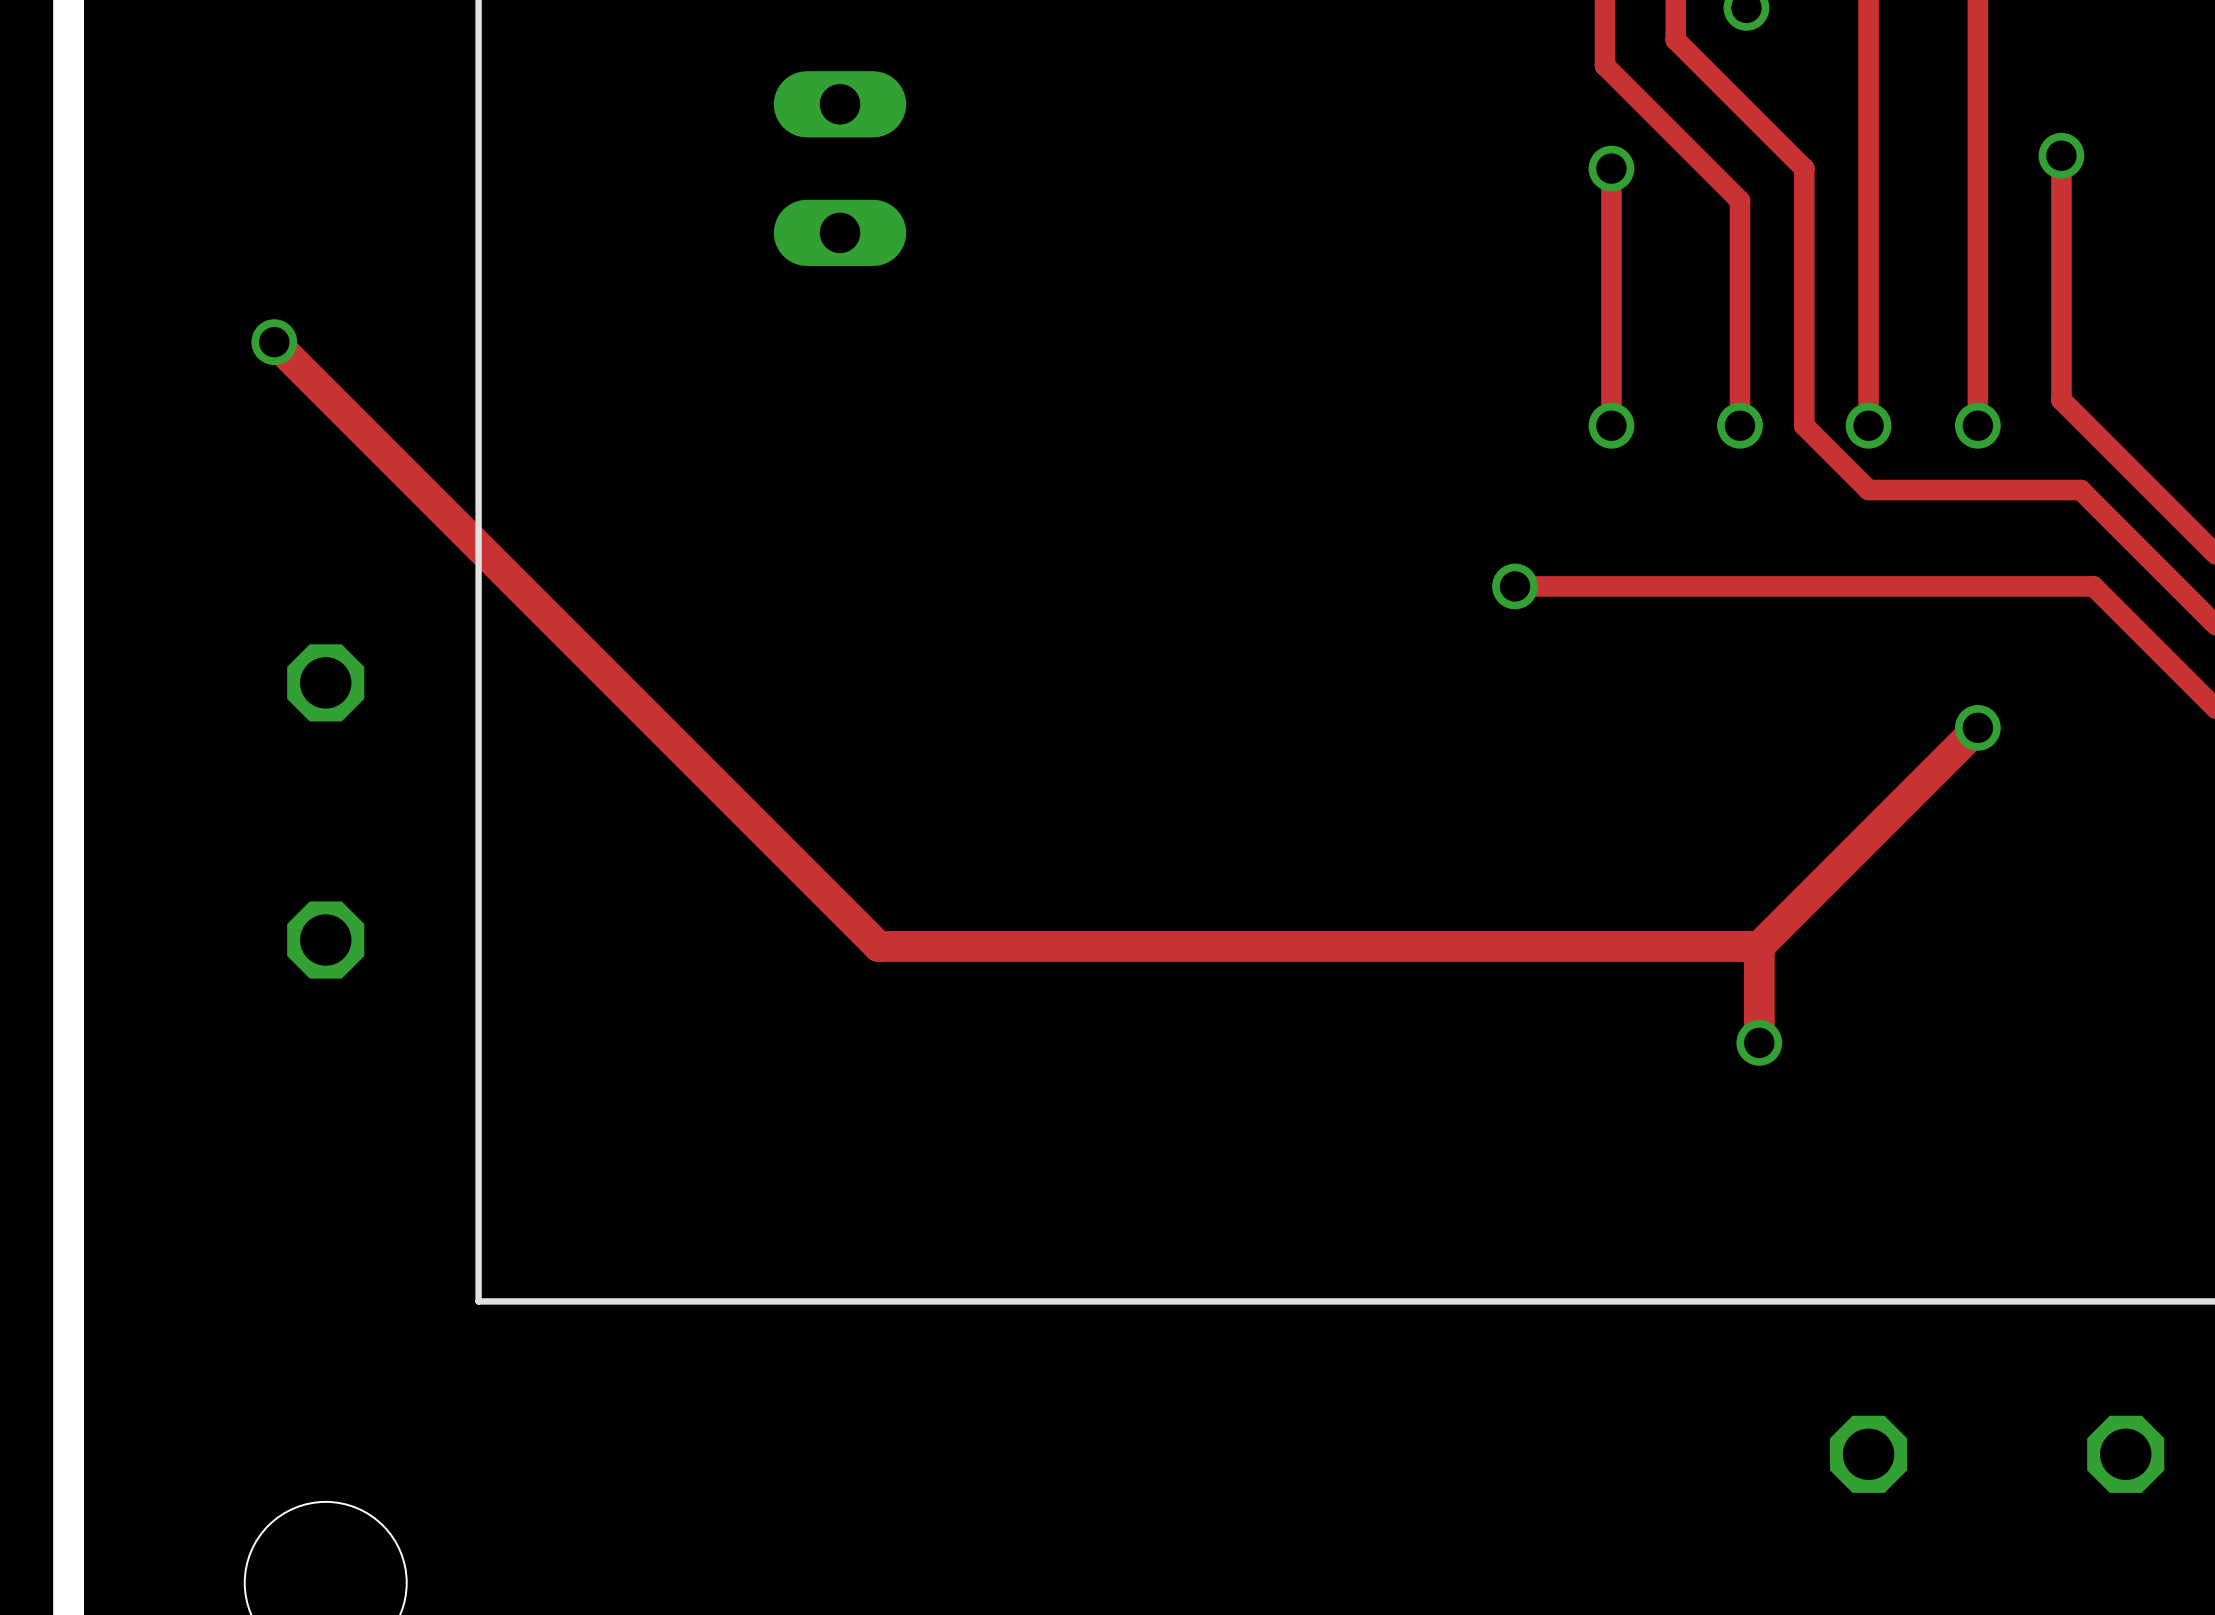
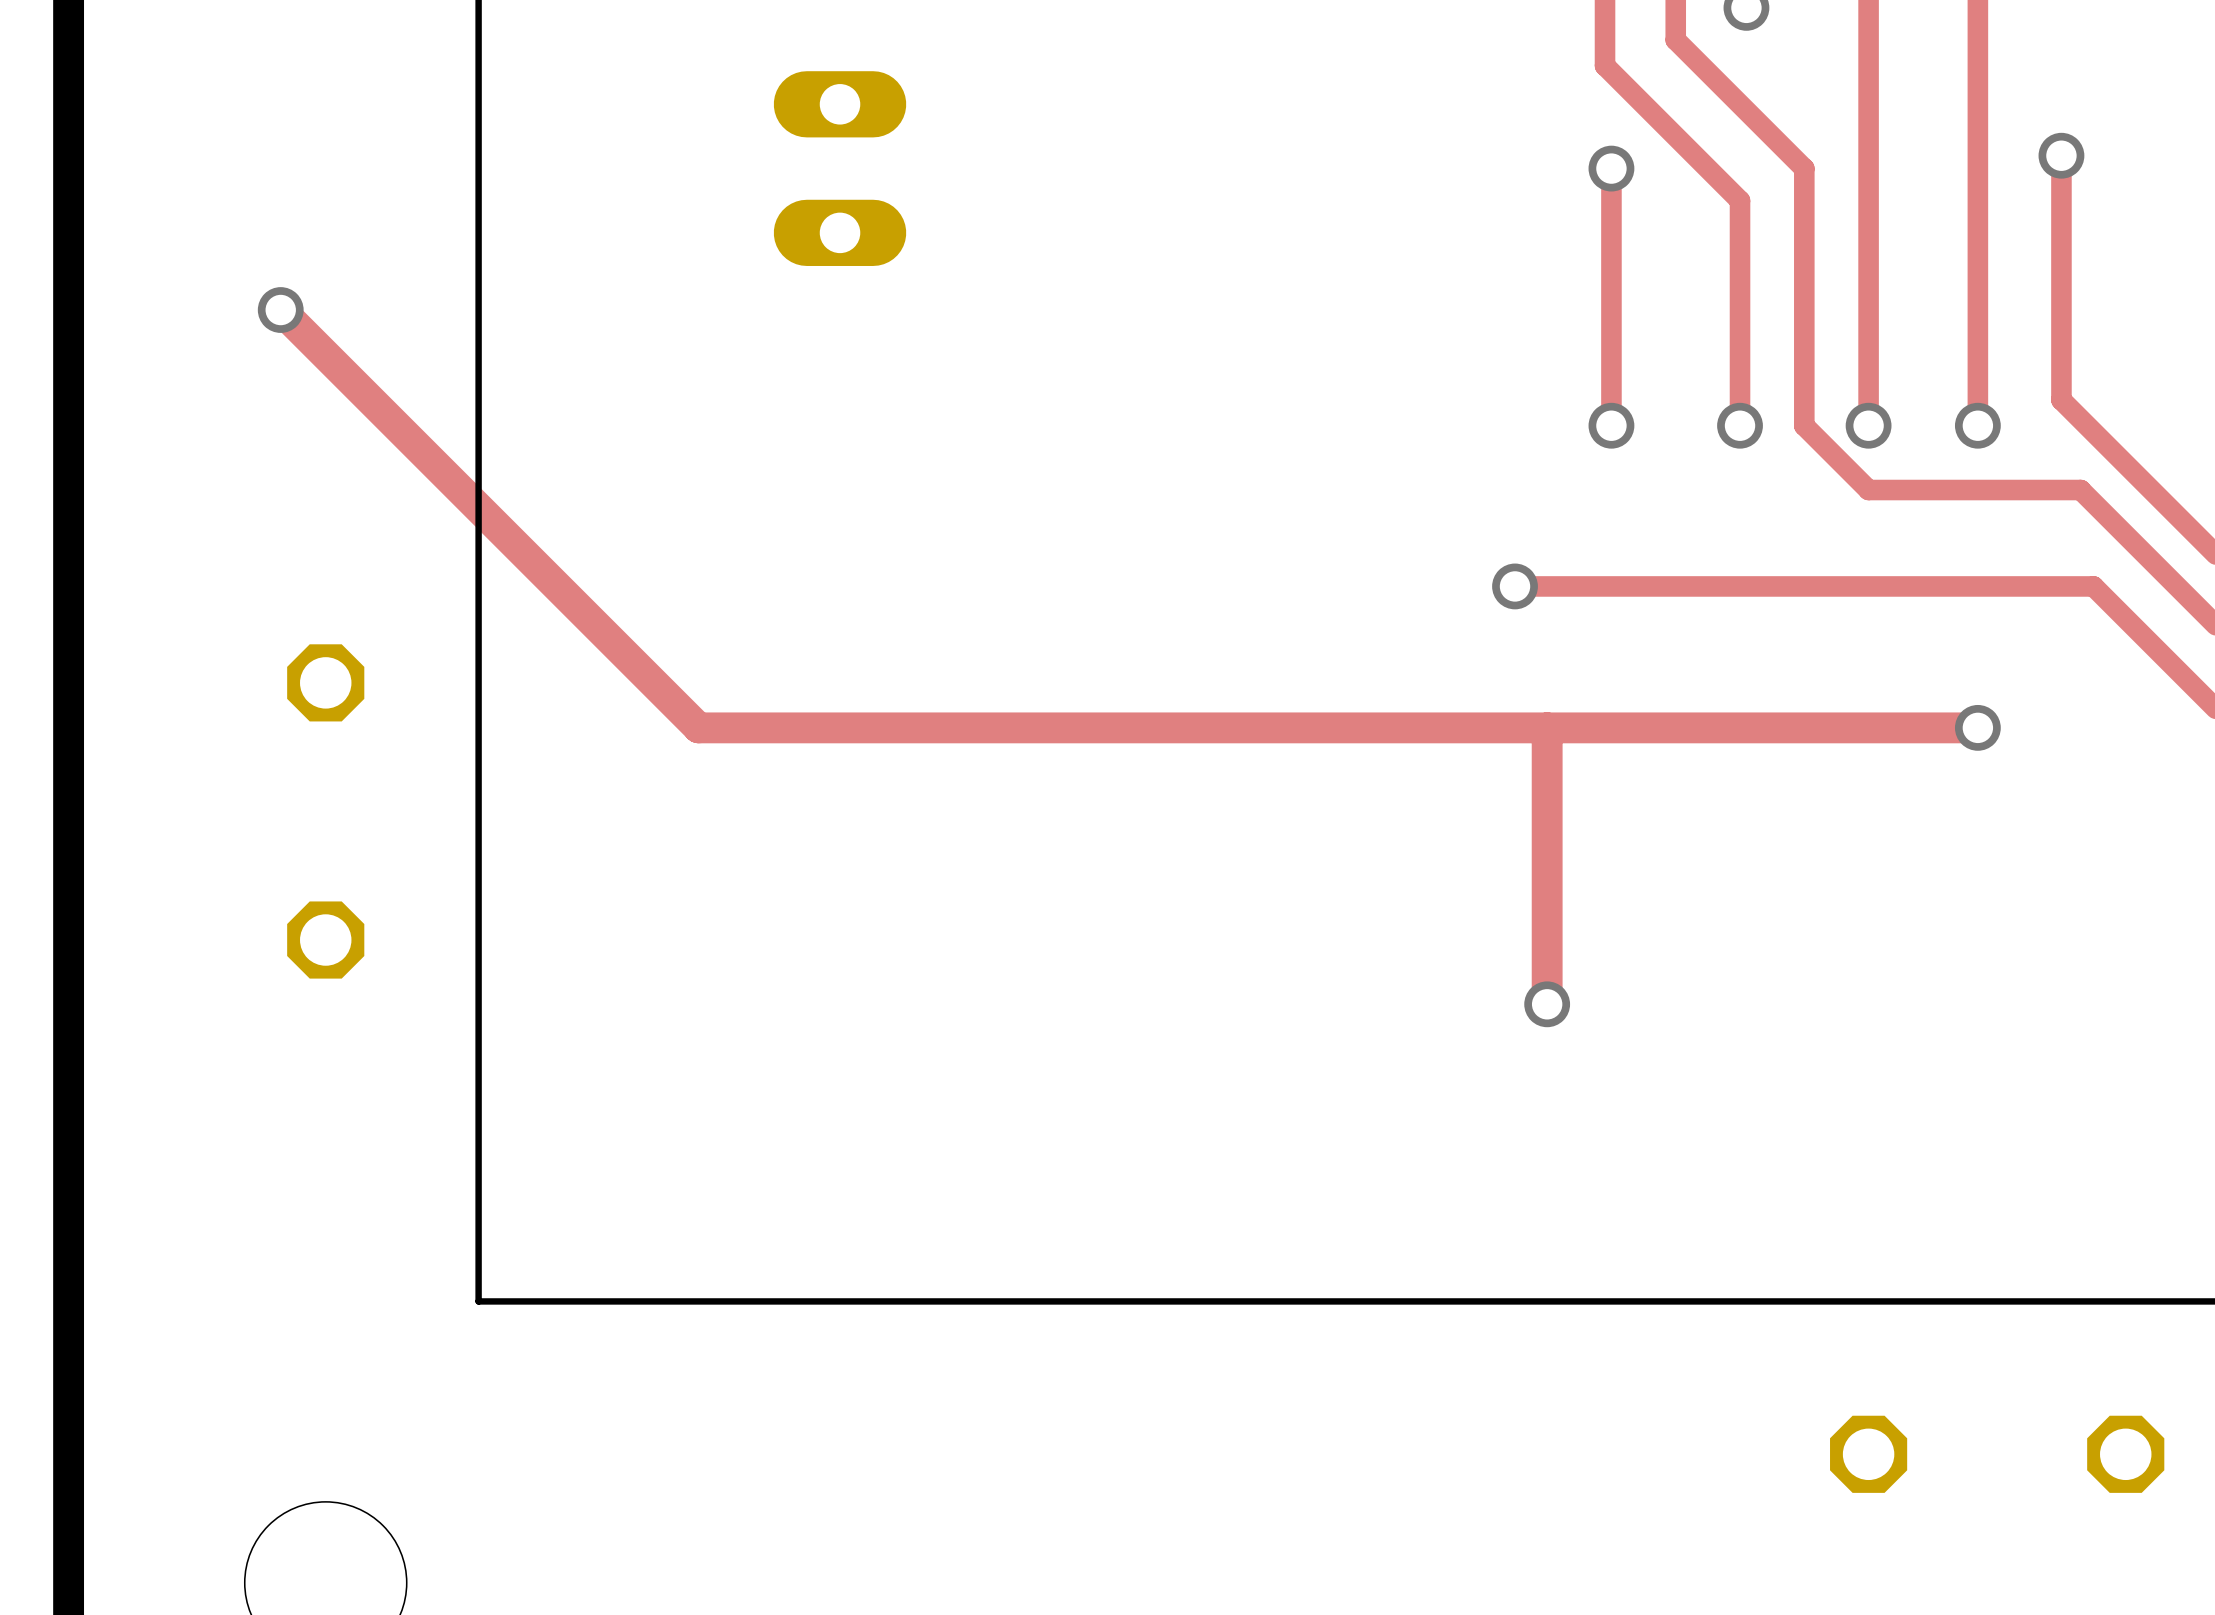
track: (274, 342) (878, 946) (1759, 946) -> none
via position: (274, 342) -> (280, 310)
track: none -> (1547, 727) (1547, 1004)
track: (1977, 727) (1759, 946) -> (1977, 727) (698, 727) (280, 310)
track: (1759, 946) (1759, 1042) -> none
via position: (1759, 1042) -> (1547, 1004)

